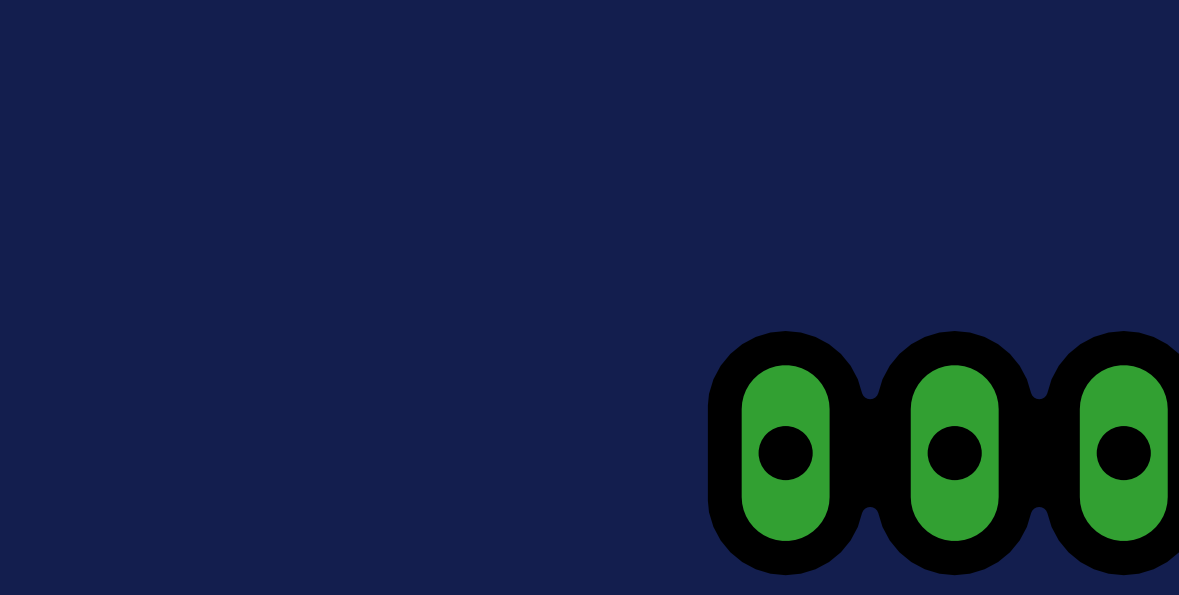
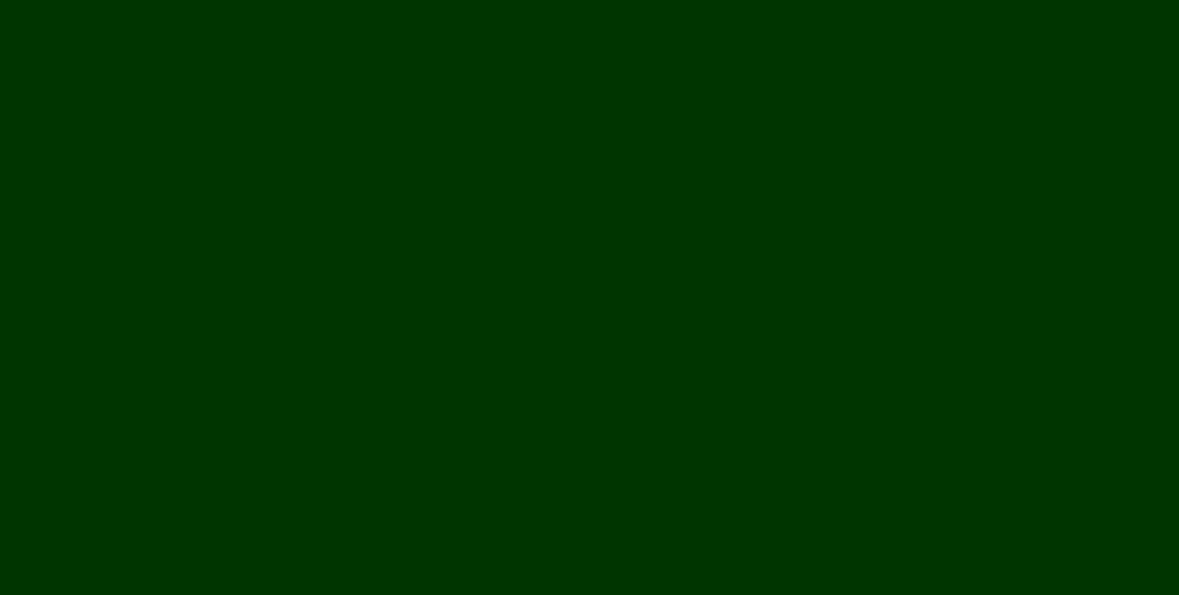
part: (954, 453) -> none

